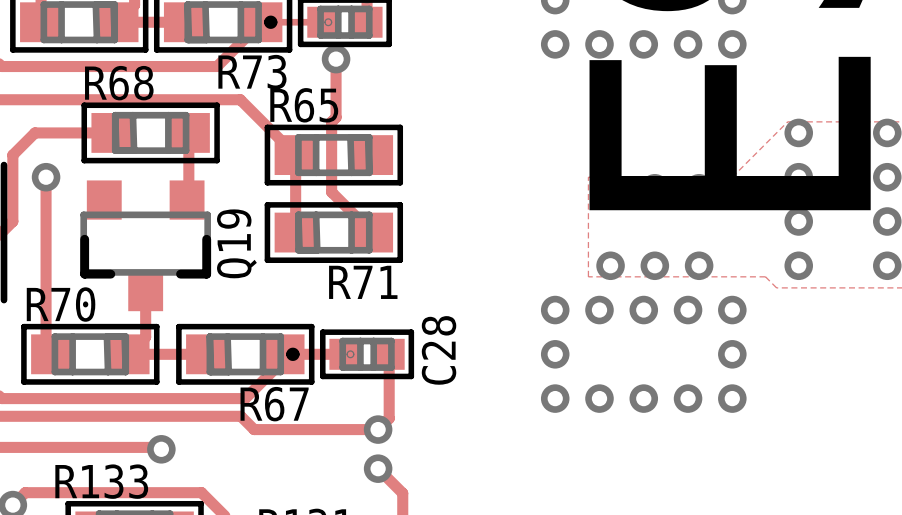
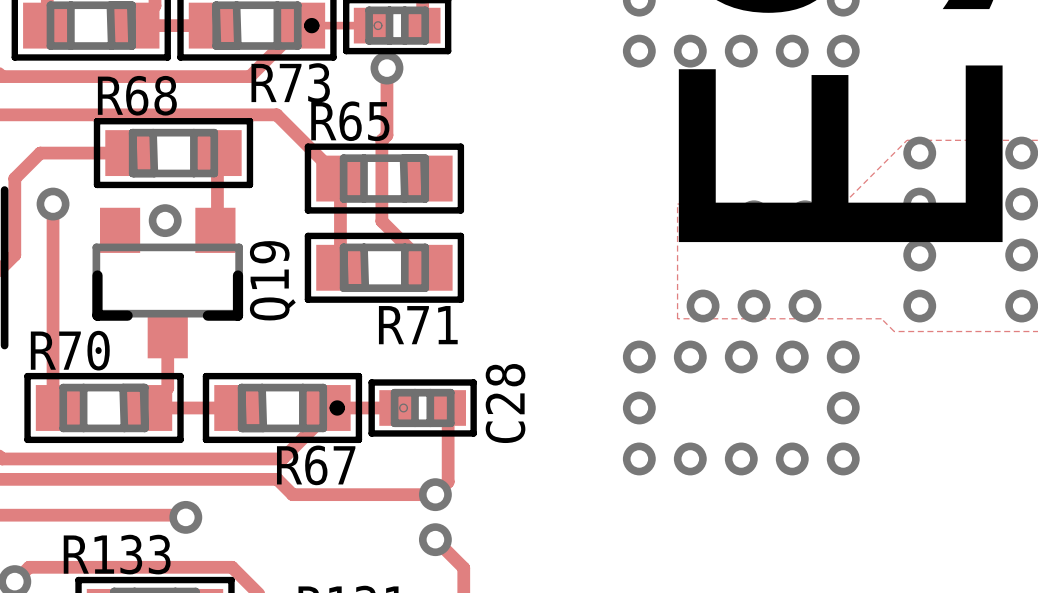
via: none -> (165, 220)

